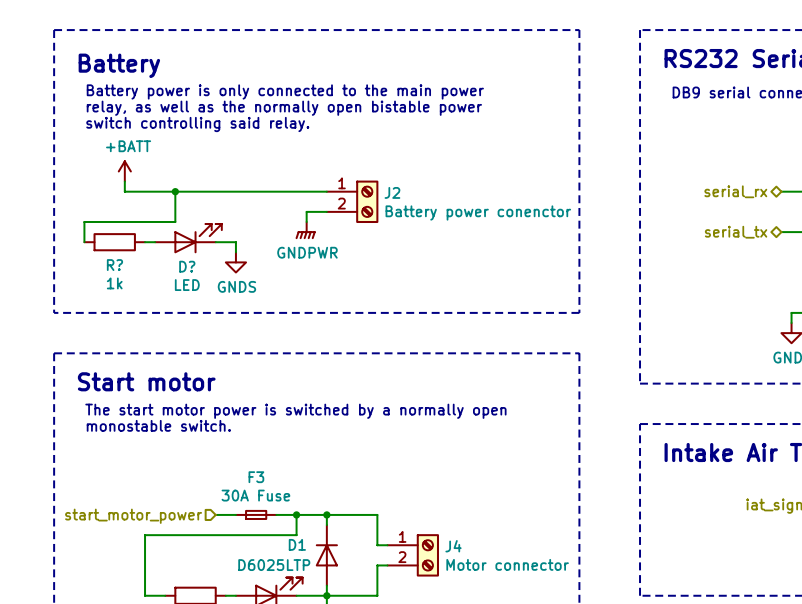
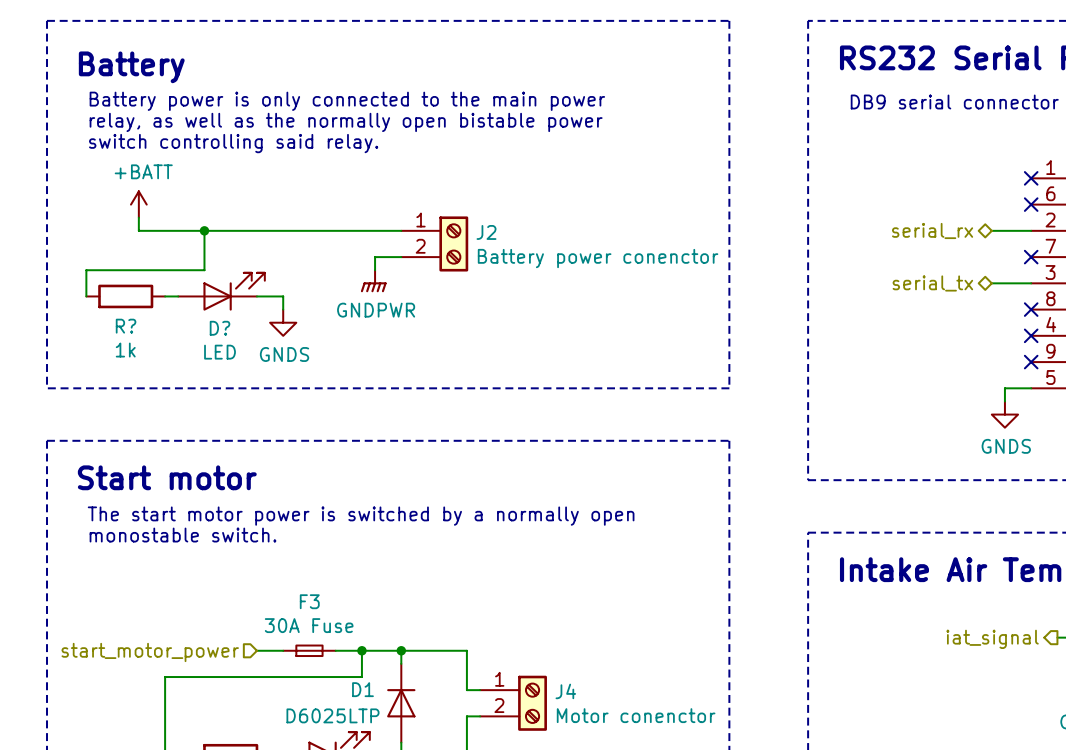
J4 value: Motor connector (507, 564) -> Motor conenctor (636, 715)

